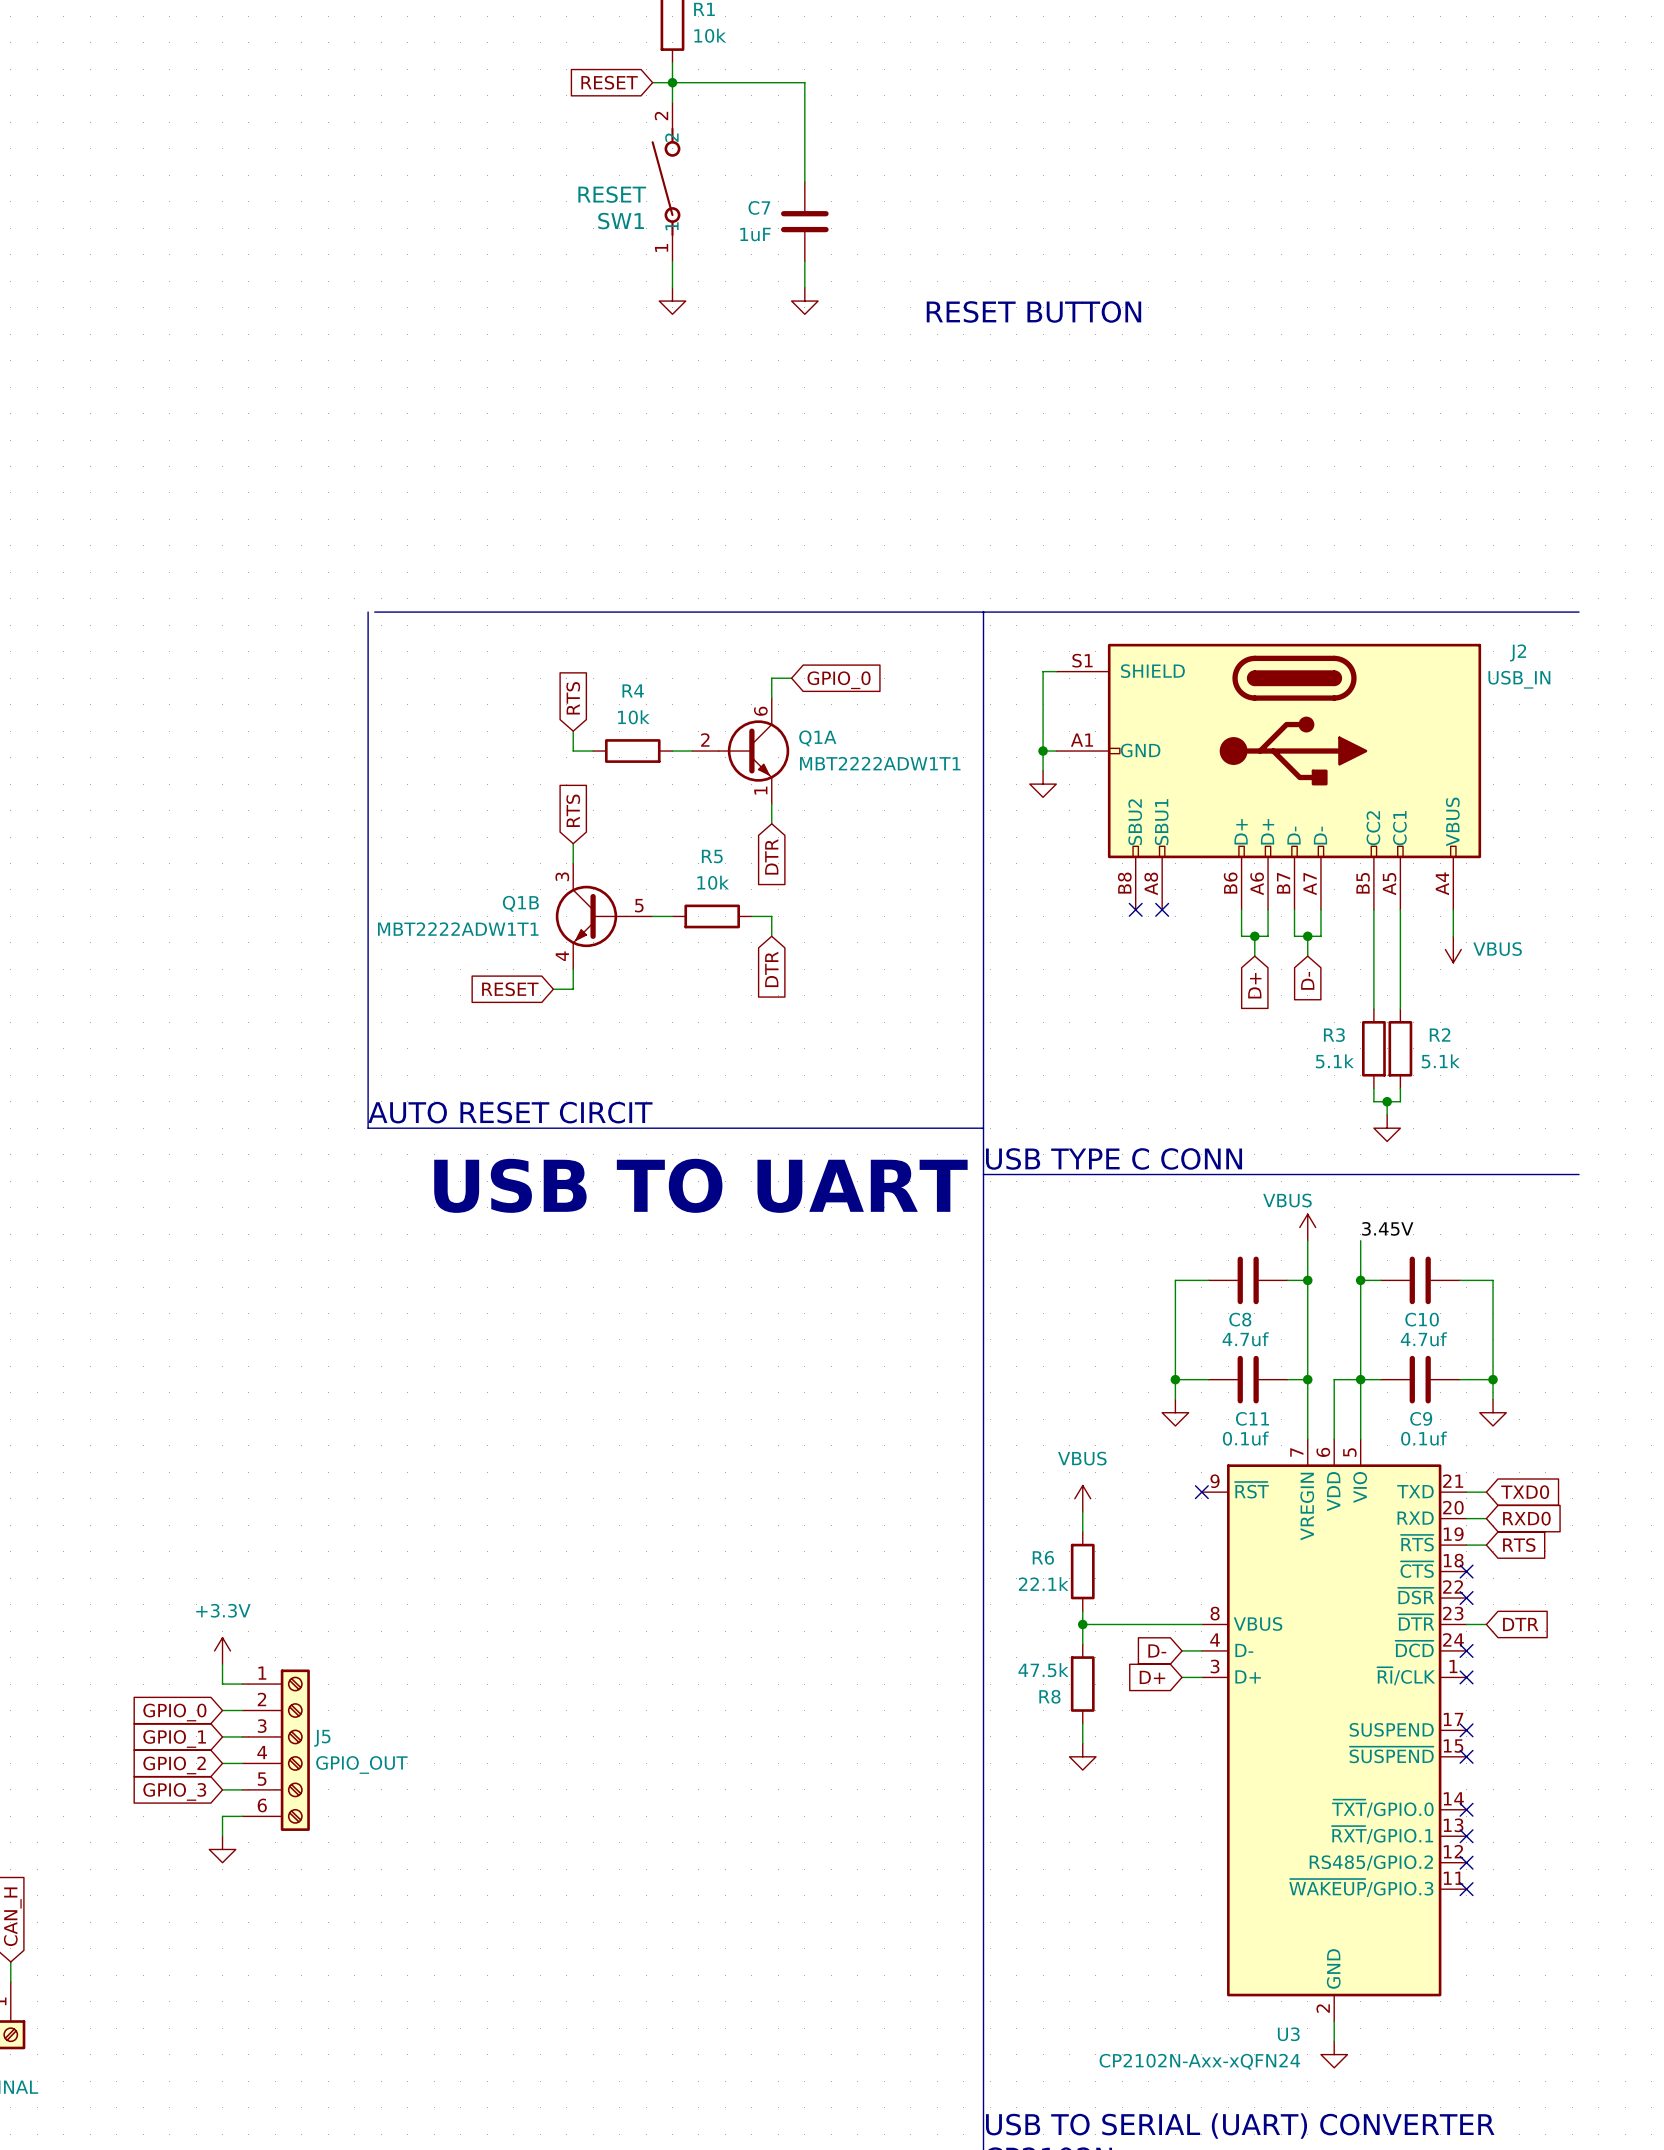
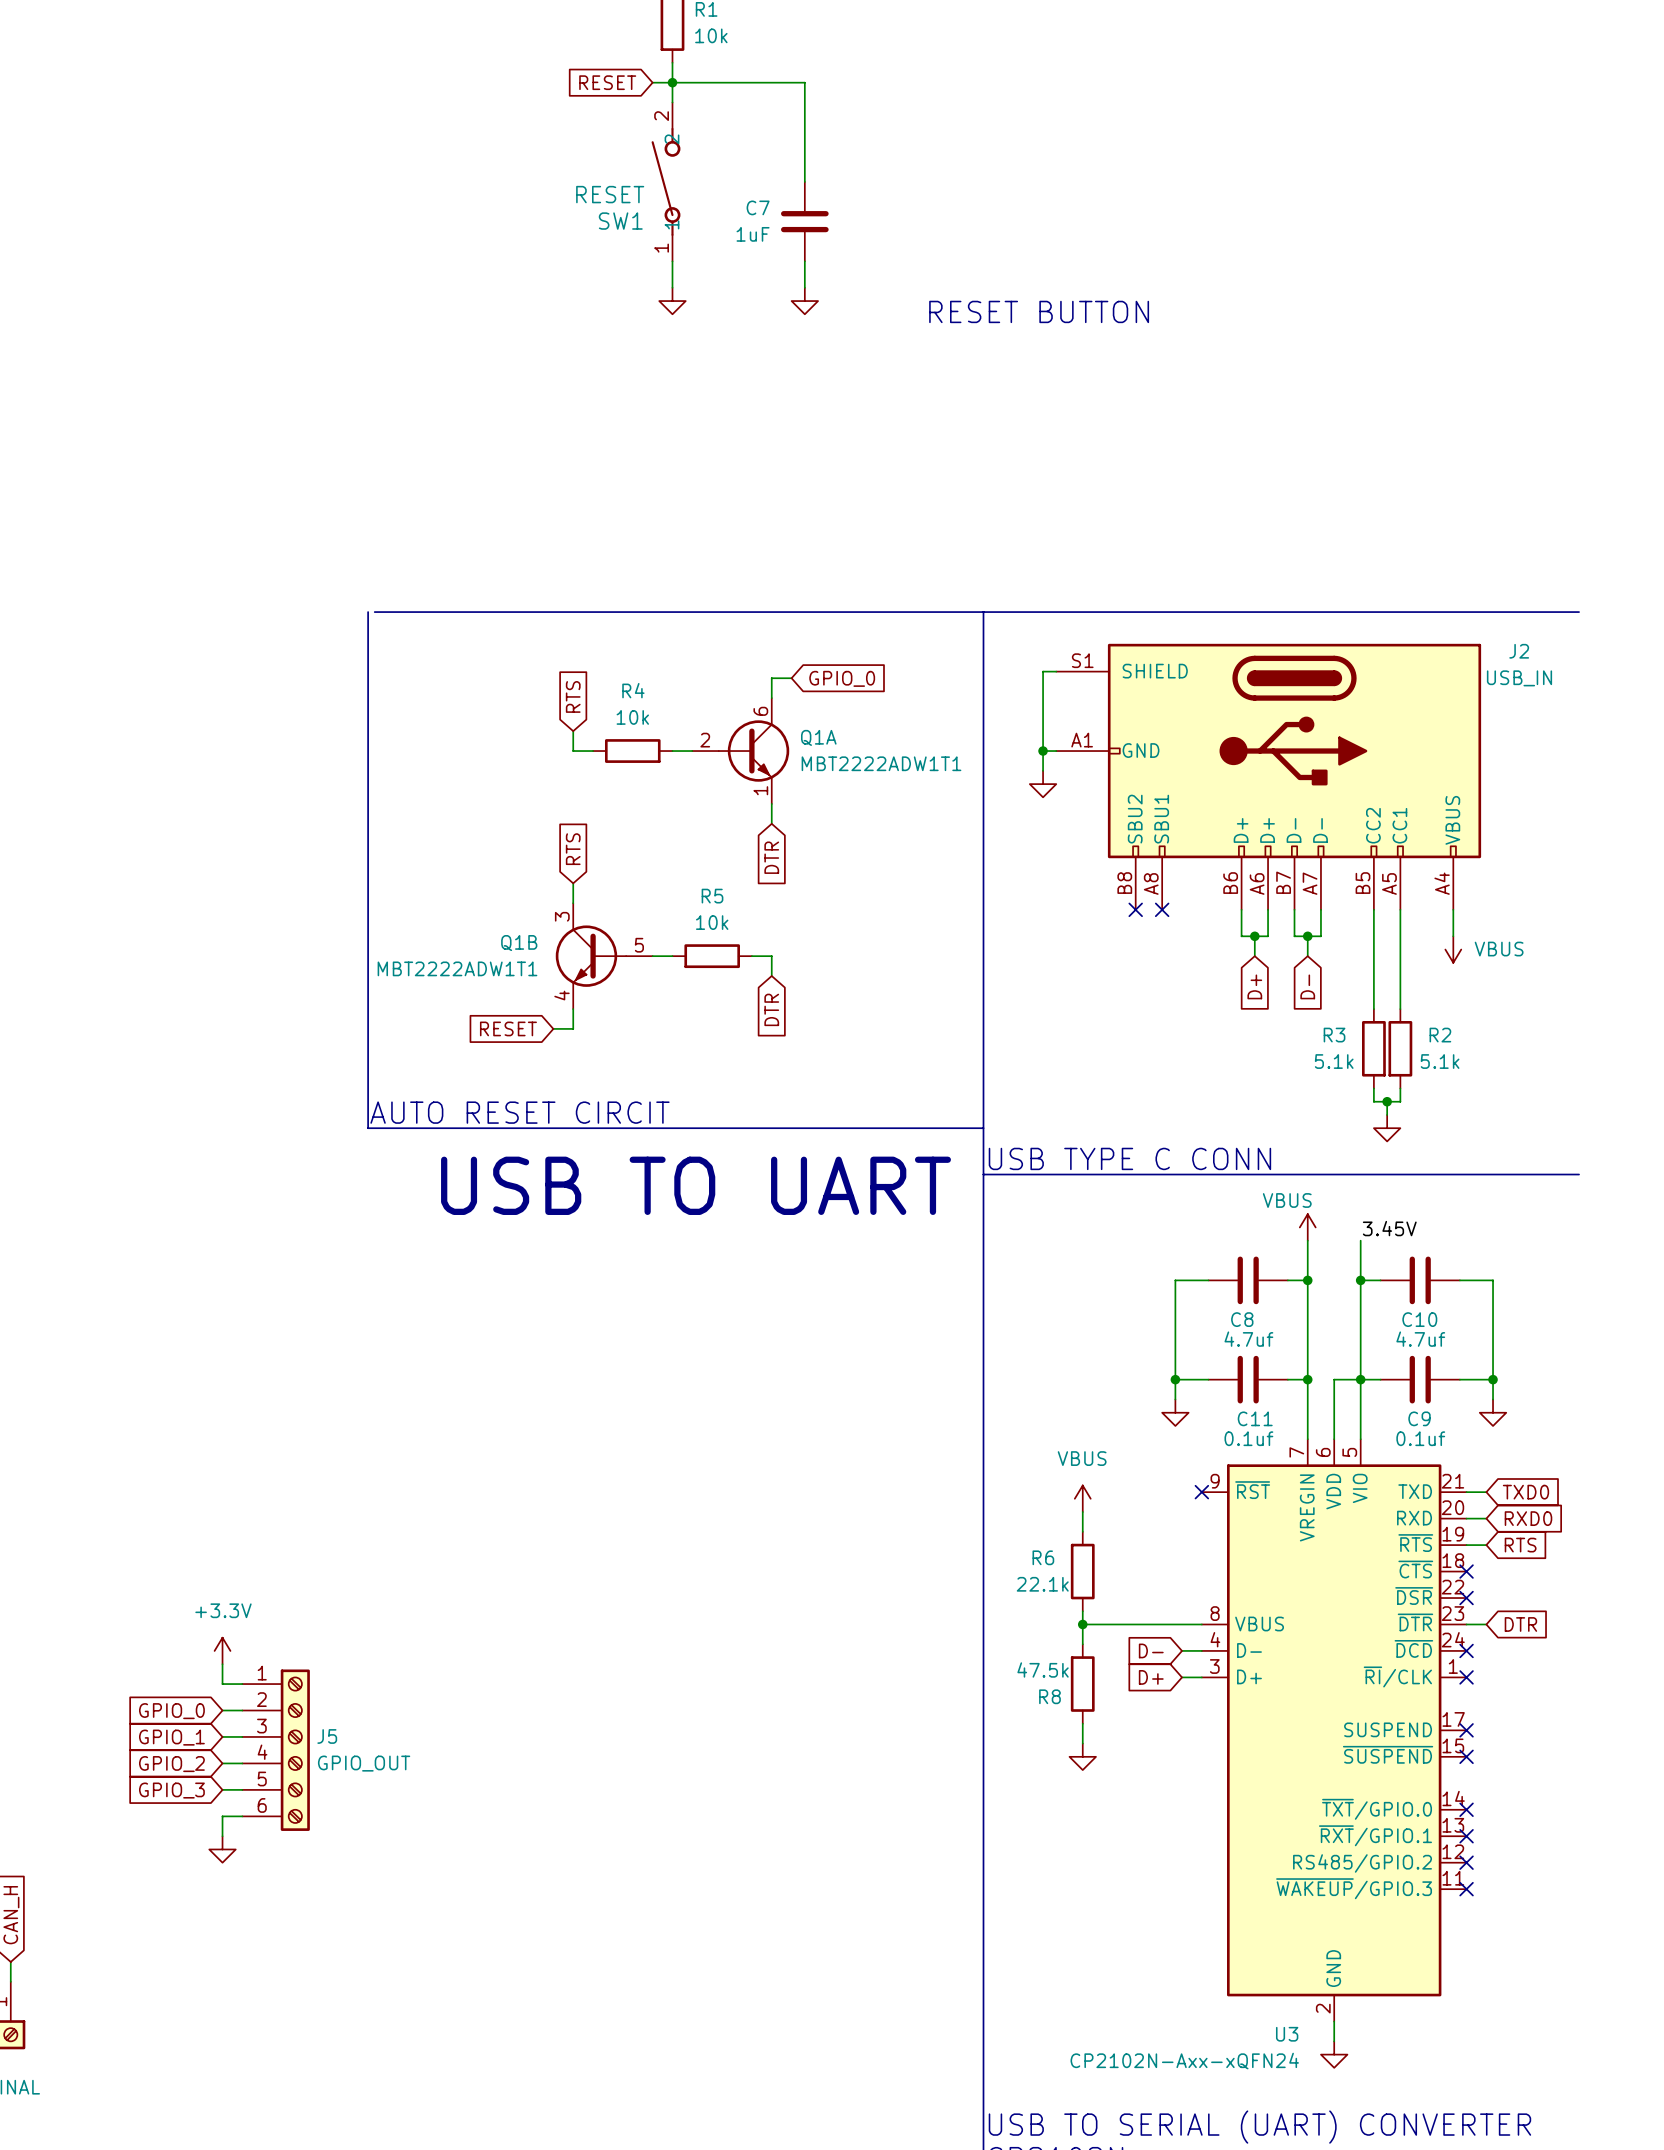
global label position: RTS (573, 810) -> RTS (573, 849)
wire: (573, 843) (573, 863) -> (573, 883) (573, 903)
Q1B position: (604, 916) -> (604, 956)
wire: (652, 916) (672, 916) -> (652, 956) (672, 956)
R5 position: (712, 916) -> (712, 956)
wire: (751, 916) (771, 916) (771, 936) -> (751, 956) (771, 956) (771, 976)
wire: (573, 969) (573, 989) (553, 989) -> (573, 1009) (573, 1028) (553, 1028)
global label position: DTR (771, 969) -> DTR (771, 1009)
global label position: RESET (510, 989) -> RESET (508, 1028)

